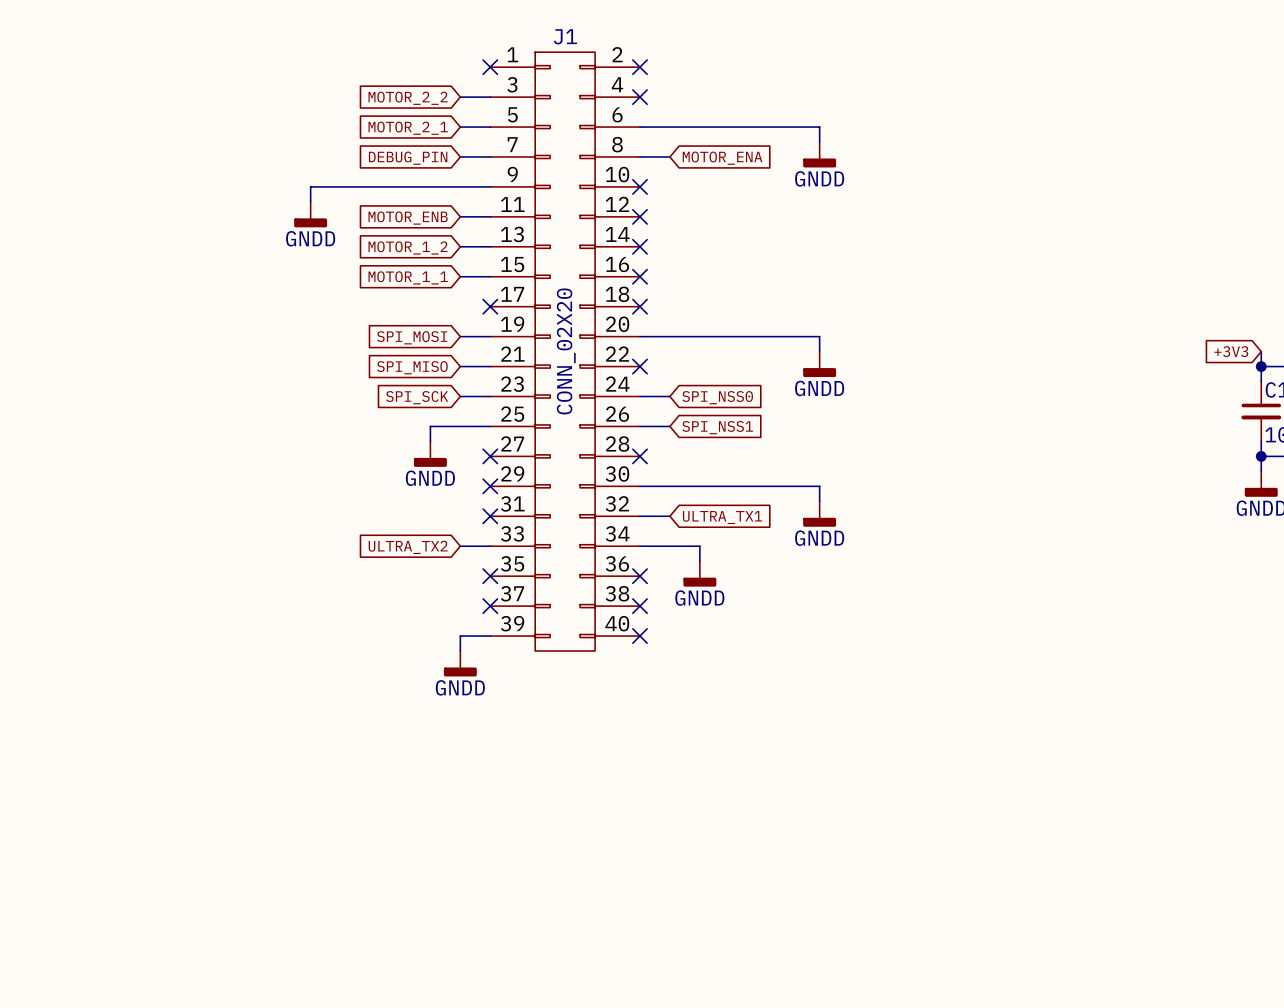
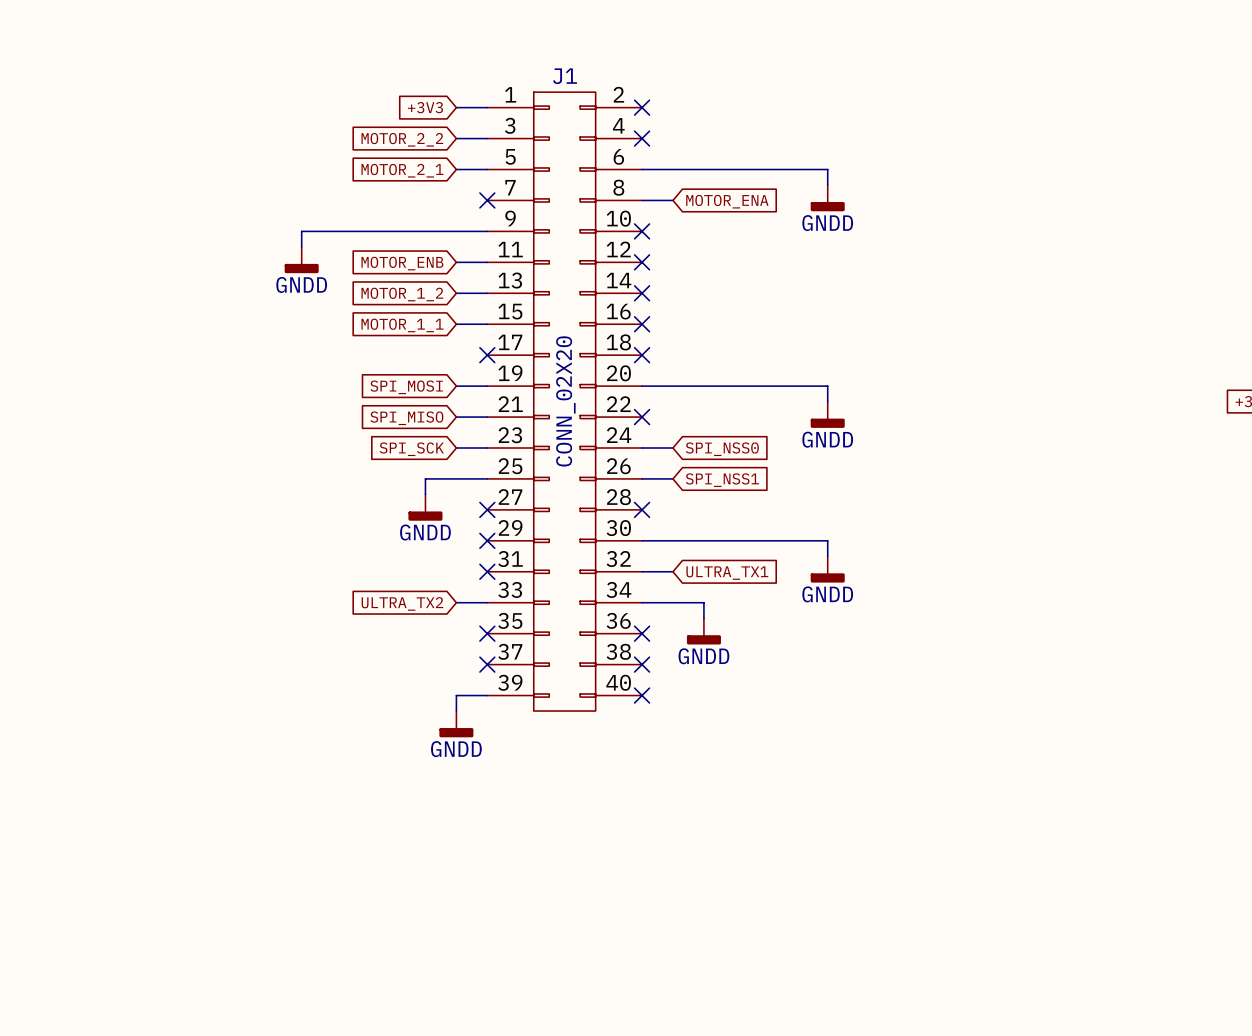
global label: none -> +3V3 (425, 107)
no-connect mark: (490, 67) -> none
wire: (460, 156) (490, 156) -> (456, 107) (487, 107)
no-connect mark: none -> (487, 200)
global label: DEBUG_PIN (408, 158) -> none

